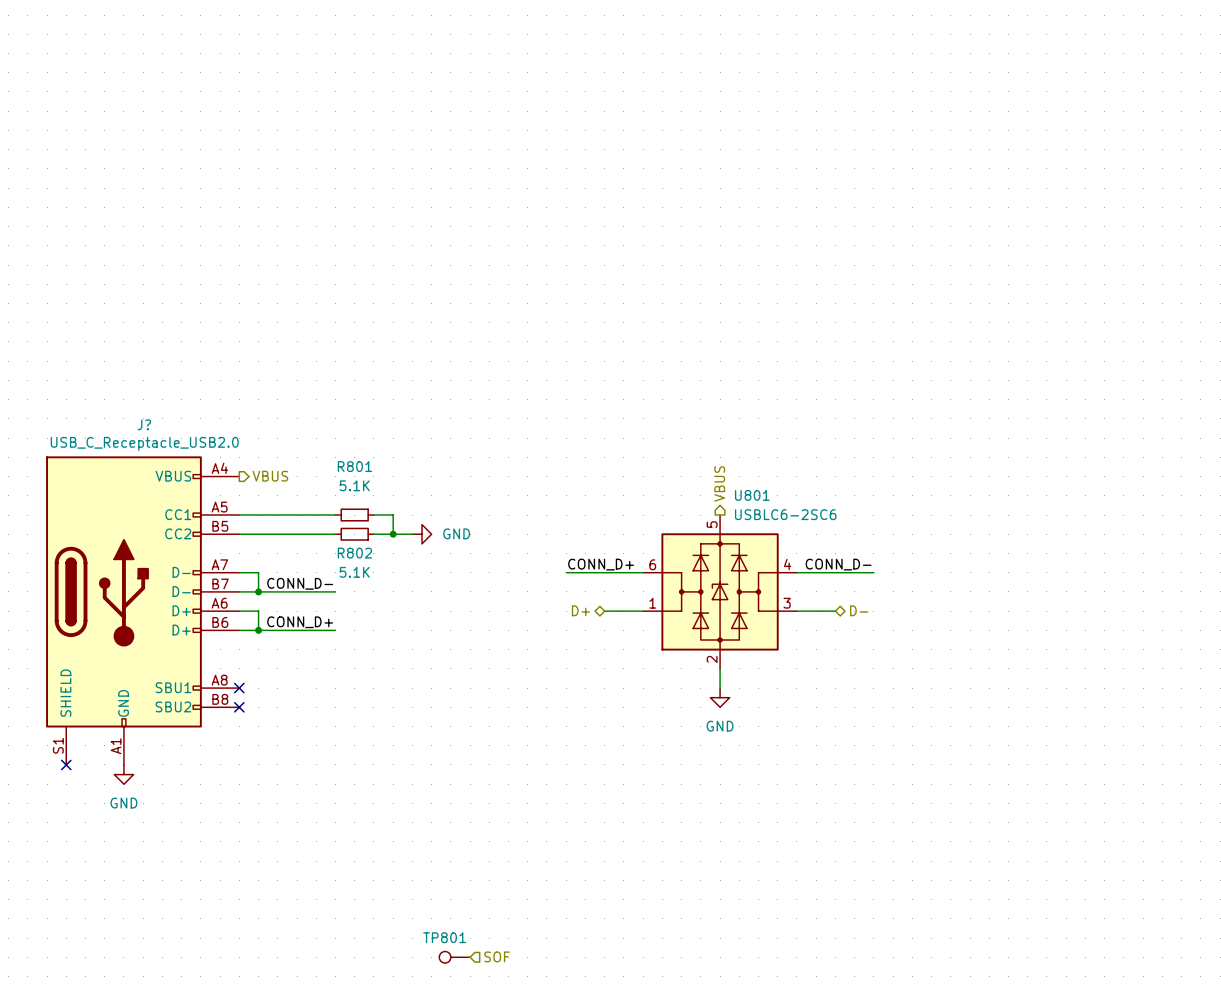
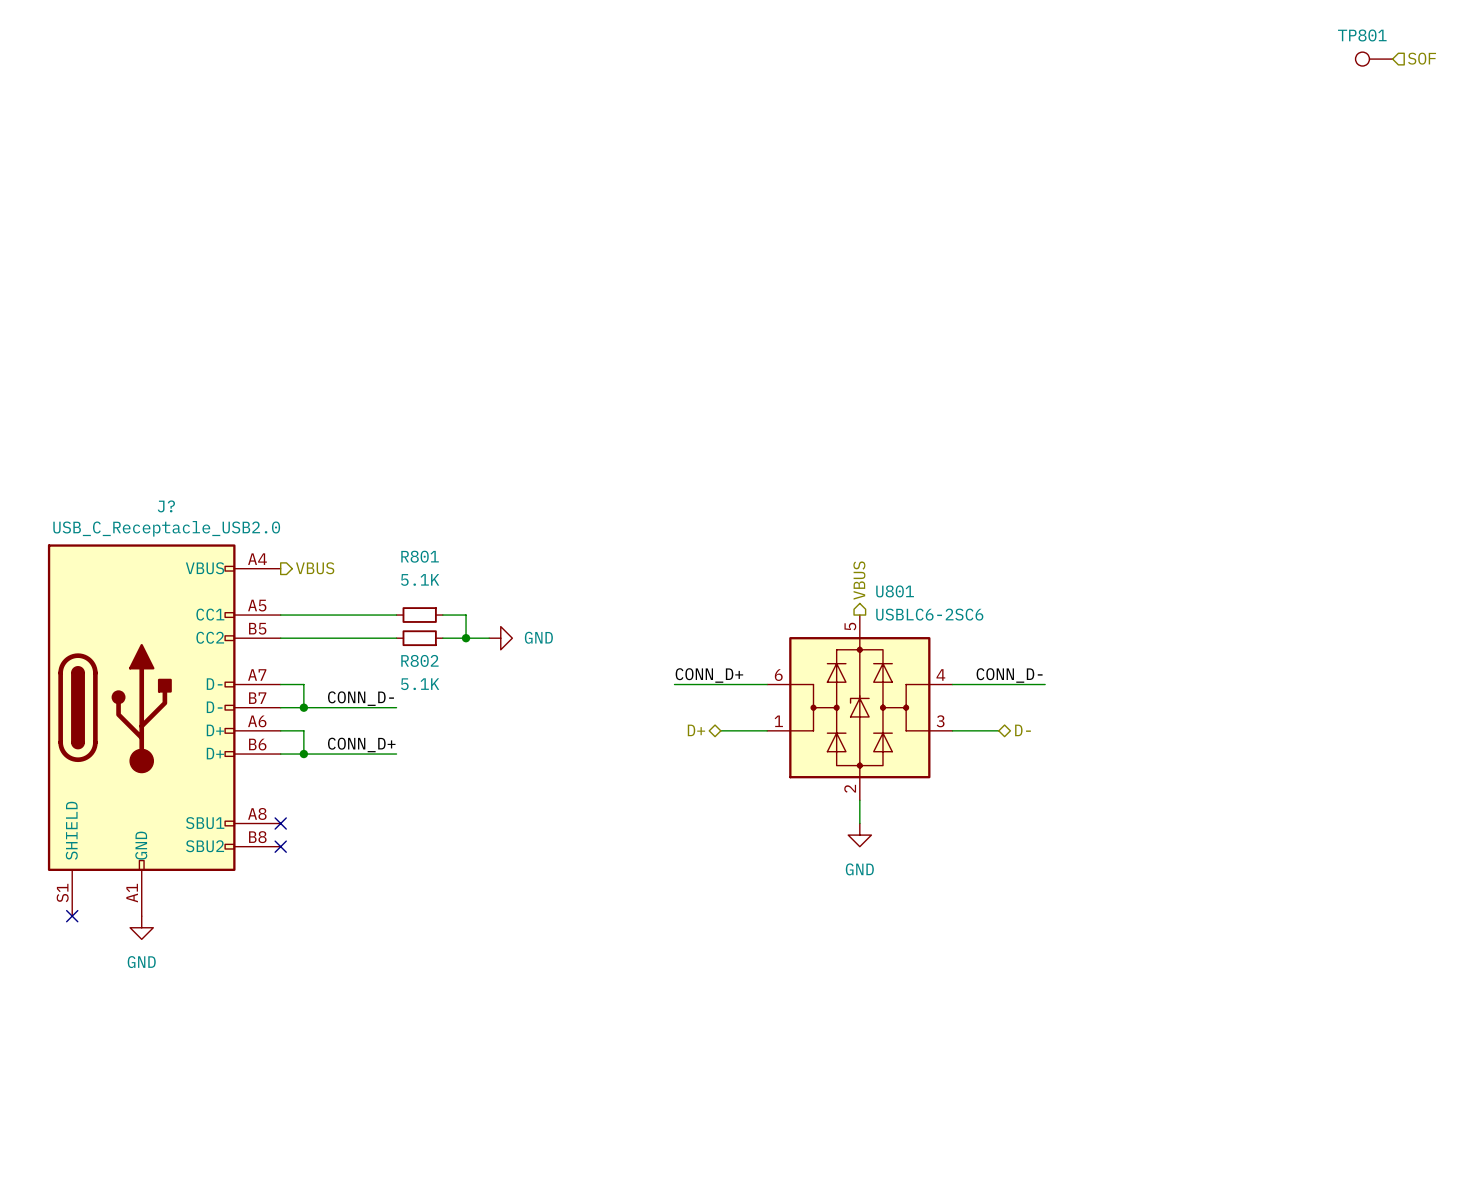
hierarchical label: none -> SOF (1422, 58)
hierarchical label: SOF (497, 956) -> none
TP801 position: (454, 957) -> (1374, 59)

